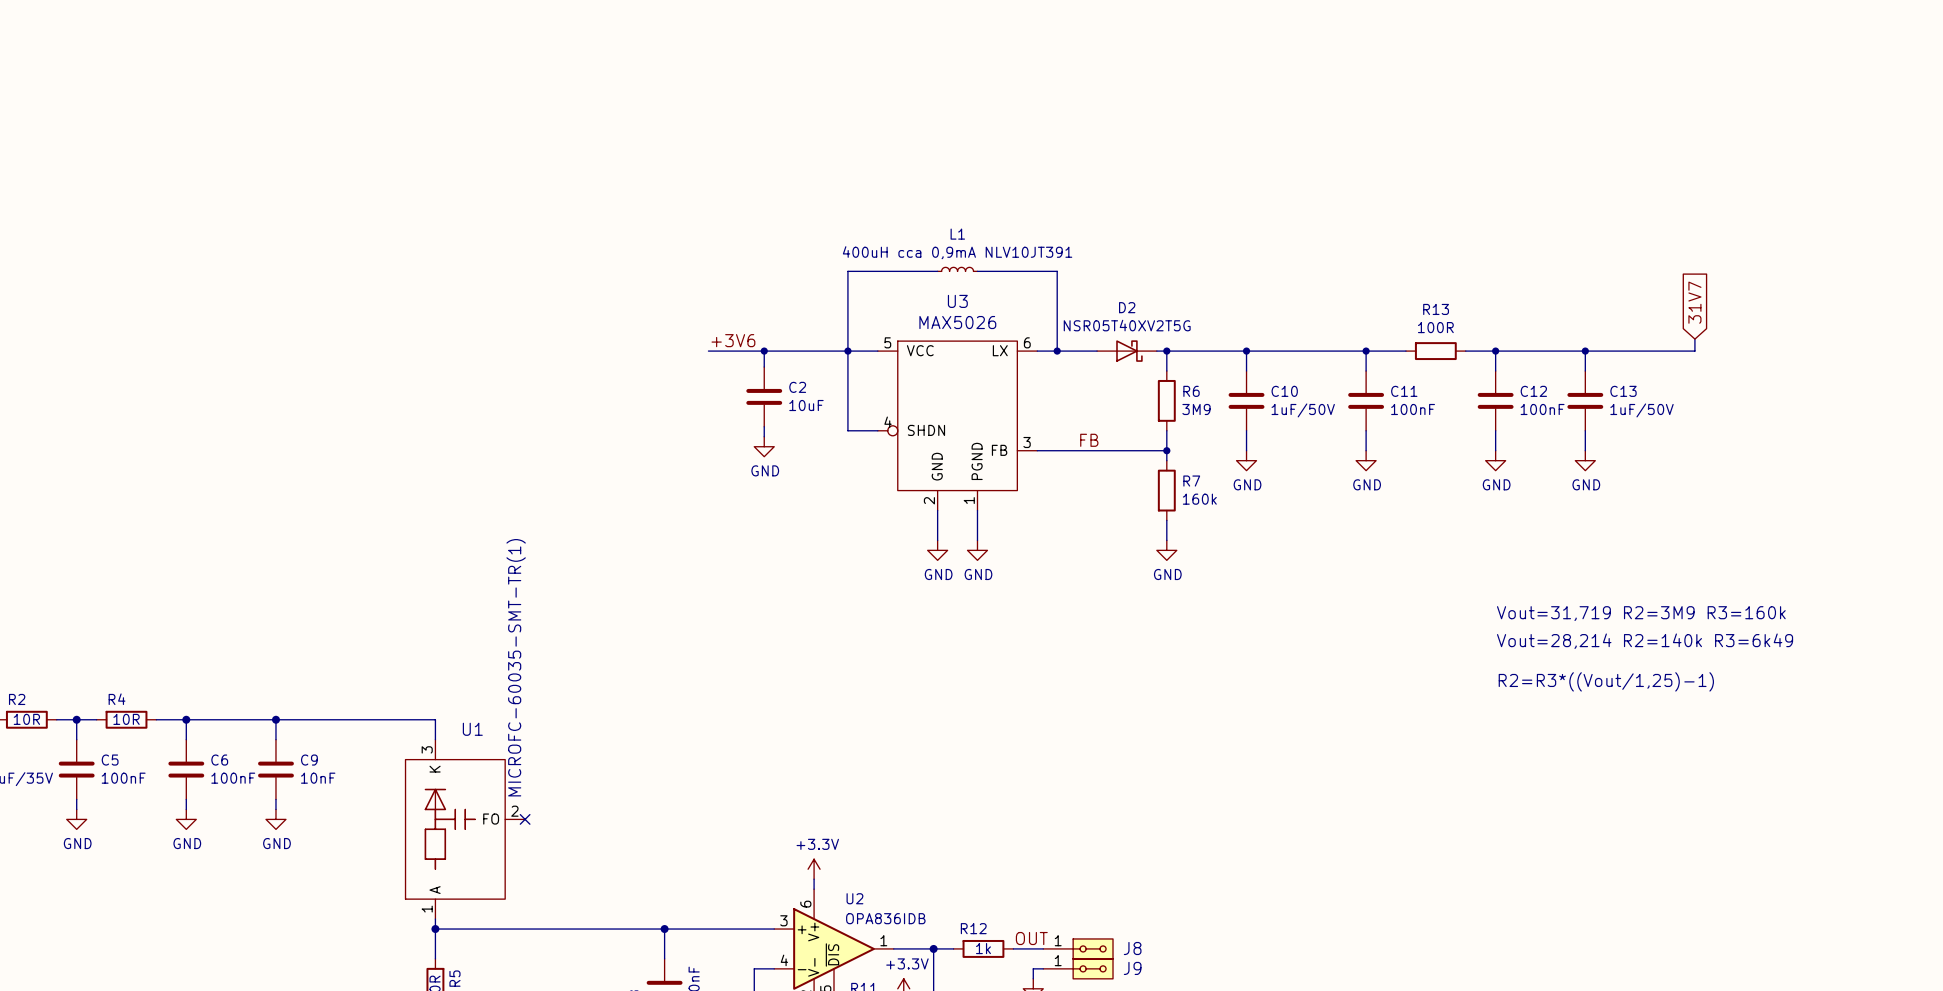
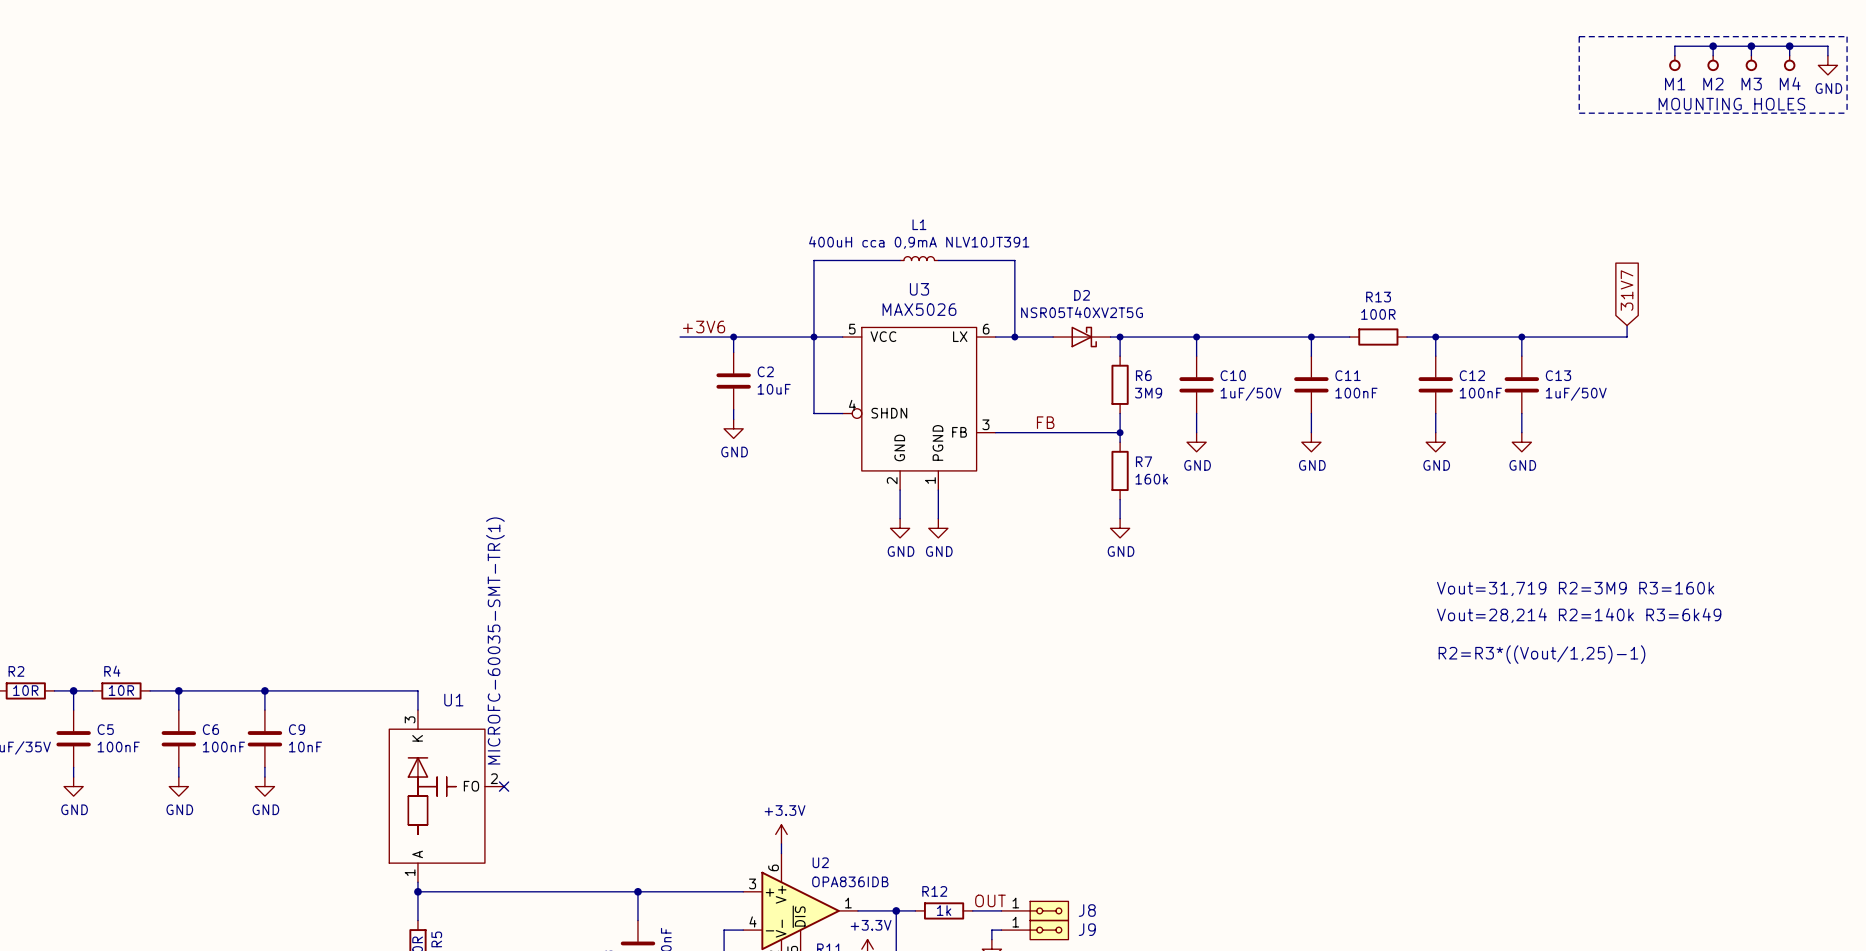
line: none -> (1579, 36) (1579, 113) (1847, 113) (1847, 36) (1579, 36)
wire: none -> (1713, 46) (1713, 55)
junction: none -> (1713, 46)
wire: none -> (1751, 46) (1751, 55)
junction: none -> (1751, 46)
wire: none -> (1789, 46) (1789, 55)
junction: none -> (1789, 46)
wire: none -> (1674, 55) (1674, 46) (1827, 46) (1827, 55)
M1: none -> (1674, 63)
M2: none -> (1713, 63)
M3: none -> (1751, 63)
M4: none -> (1789, 63)
power symbol: none -> GND (1827, 65)
text: none -> MOUNTING HOLES (1731, 104)

